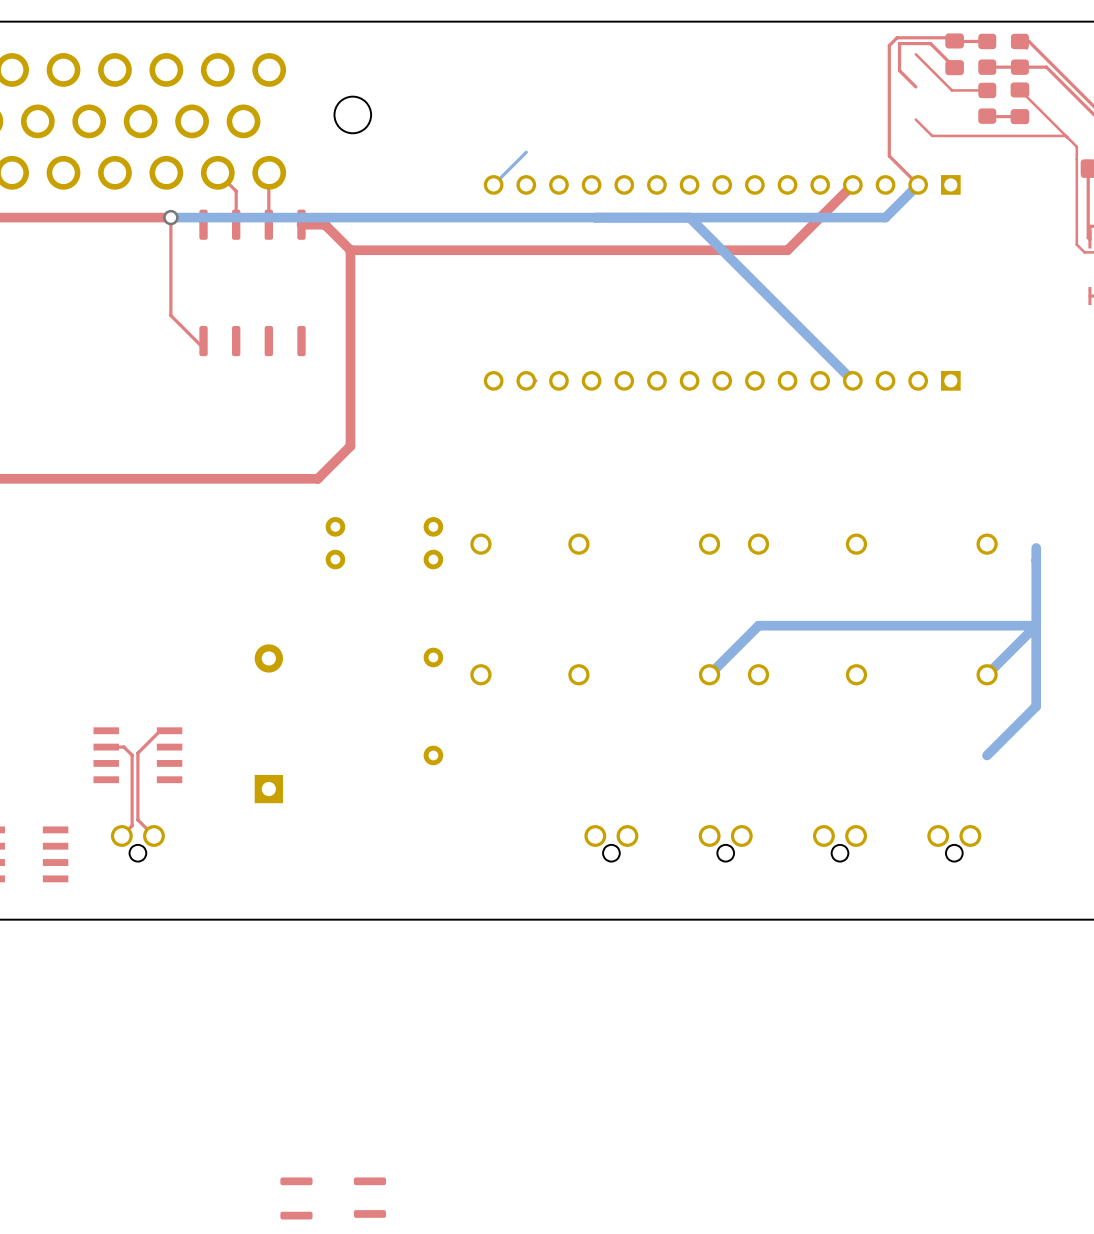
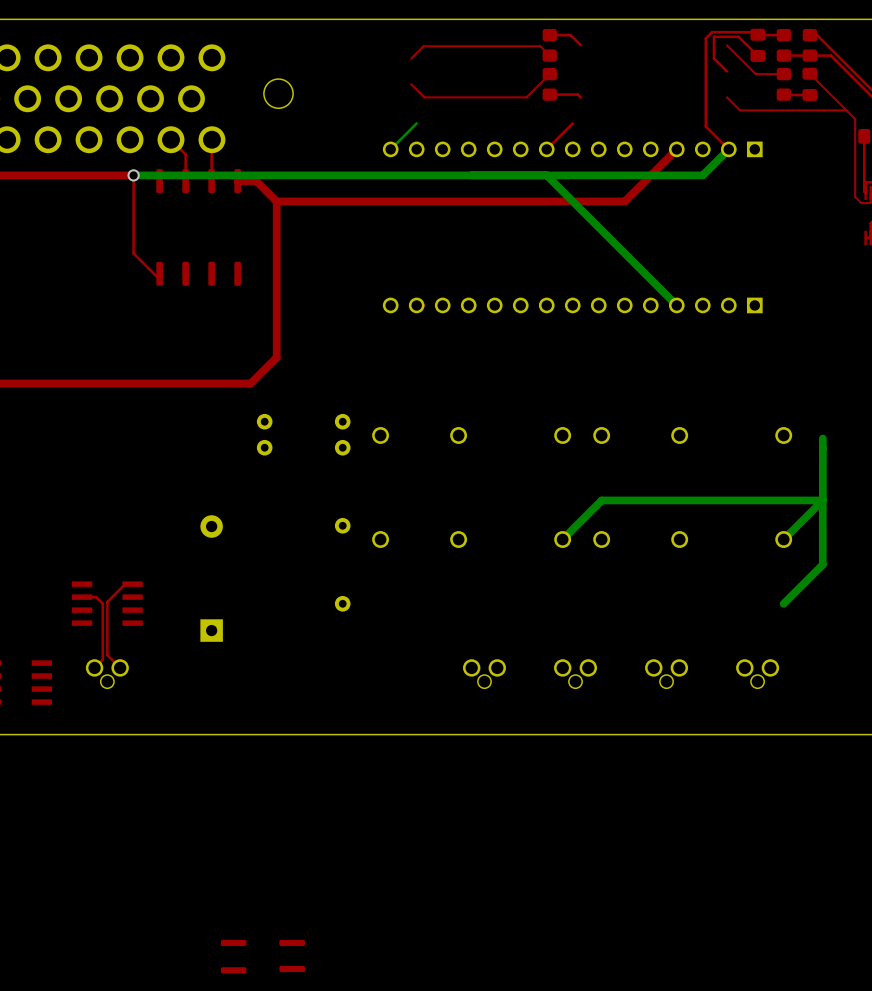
top track: none -> (549, 35) (570, 35) (580, 45)
part: none -> (549, 45)
top track: none -> (549, 55) (540, 46) (423, 46) (411, 58)
top track: none -> (549, 74) (526, 97) (424, 97) (411, 84)
part: none -> (549, 84)
top track: none -> (549, 94) (577, 94) (580, 97)
top track: none -> (572, 123) (546, 149)

